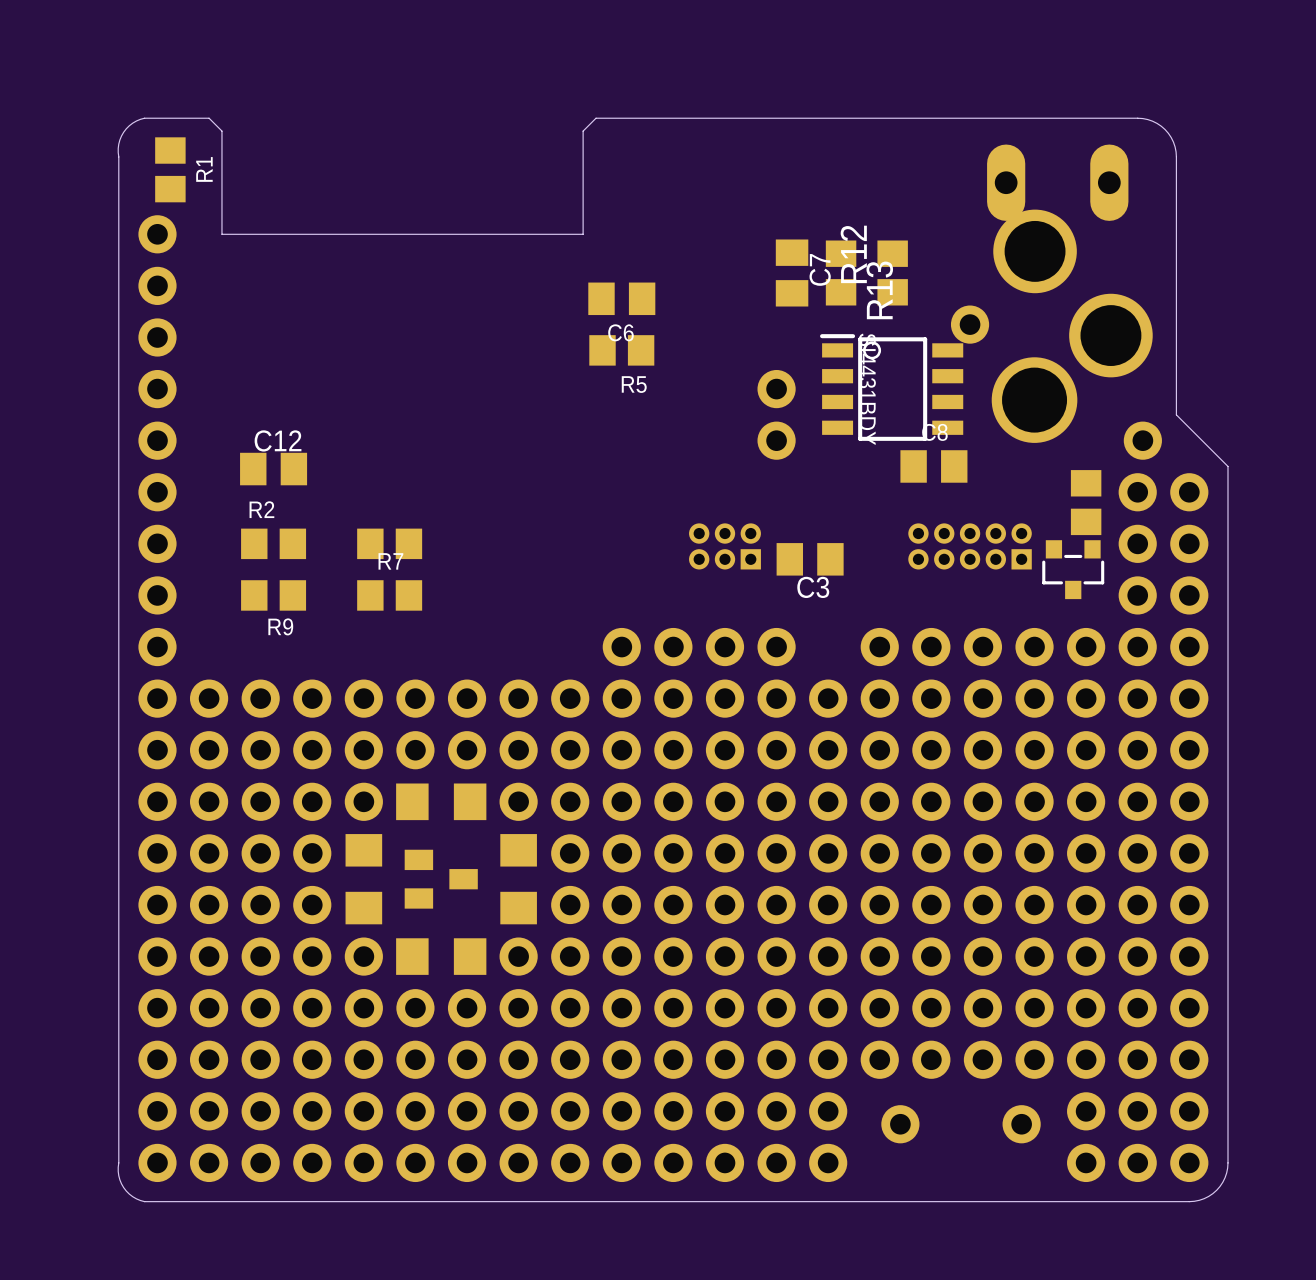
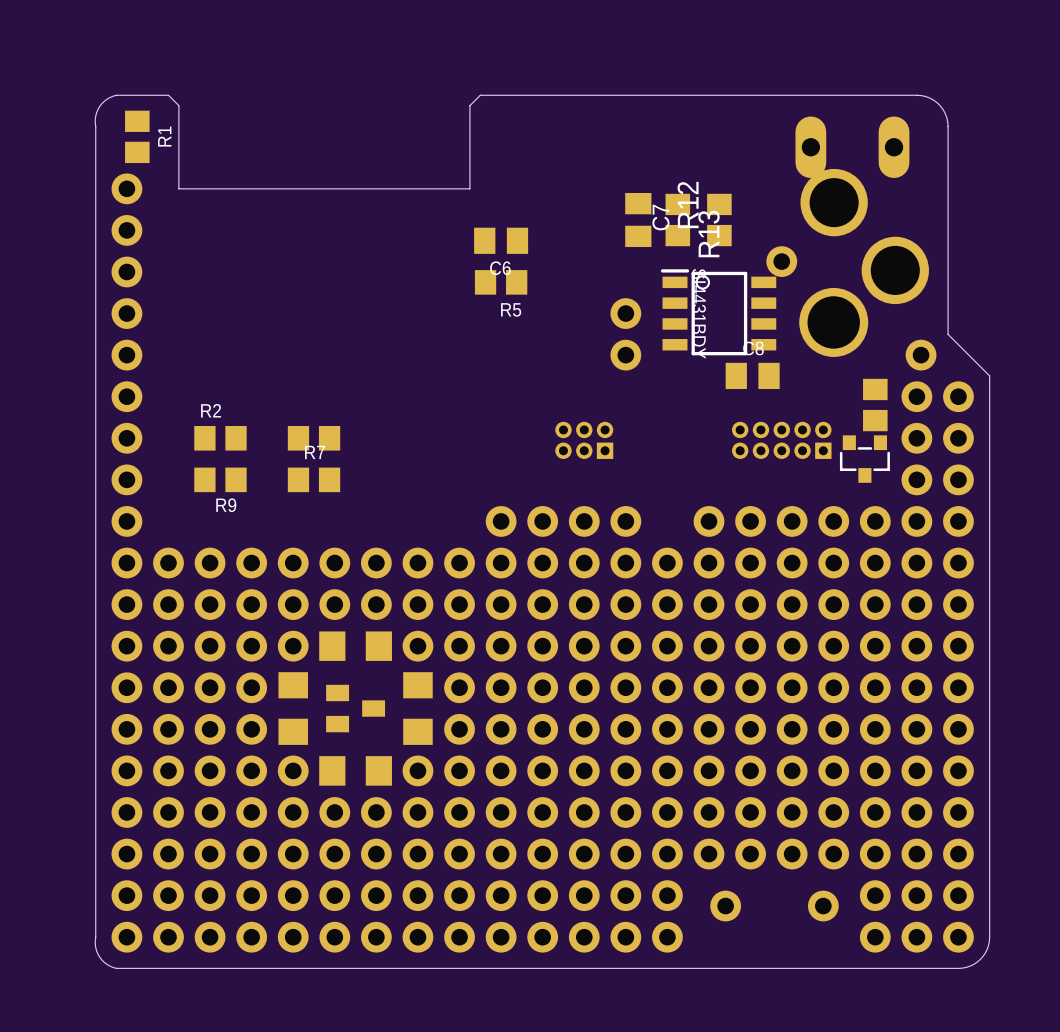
C12: (273, 469) -> none
C3: (810, 559) -> none

